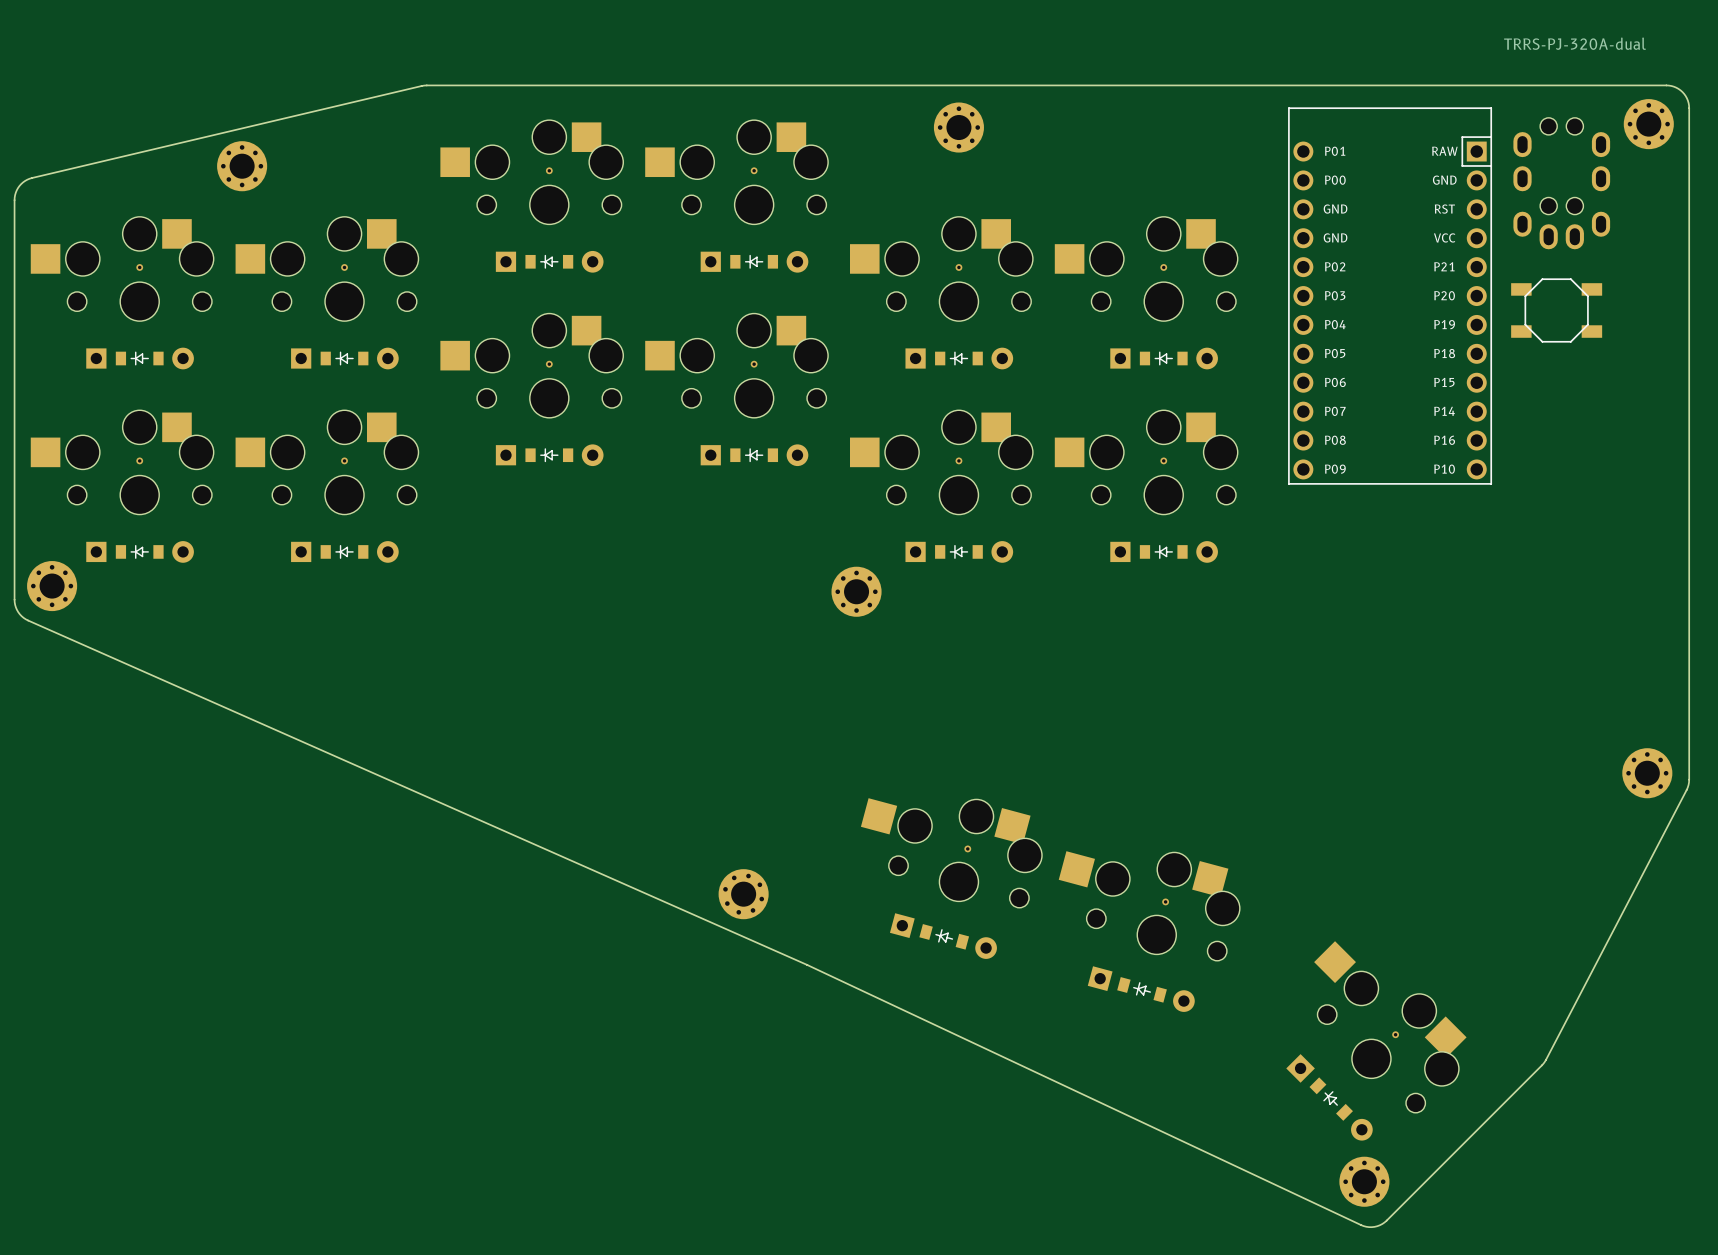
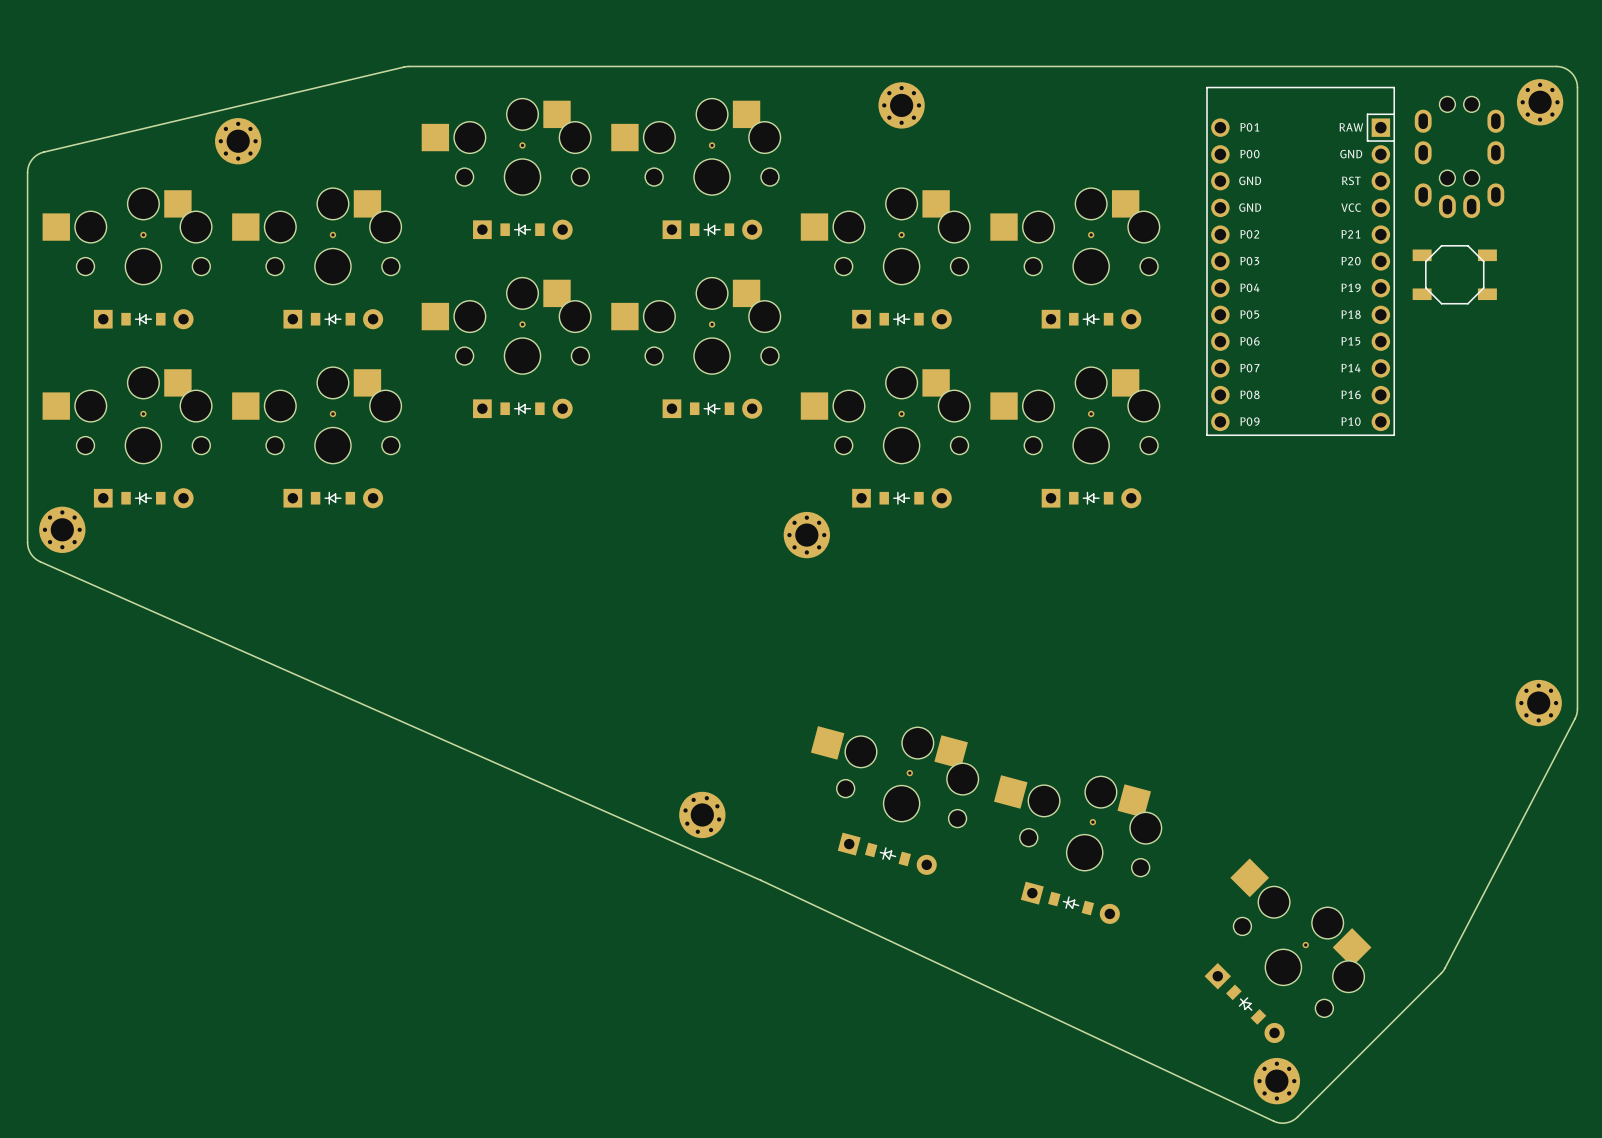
part value: TRRS-PJ-320A-dual (1575, 43) -> none

